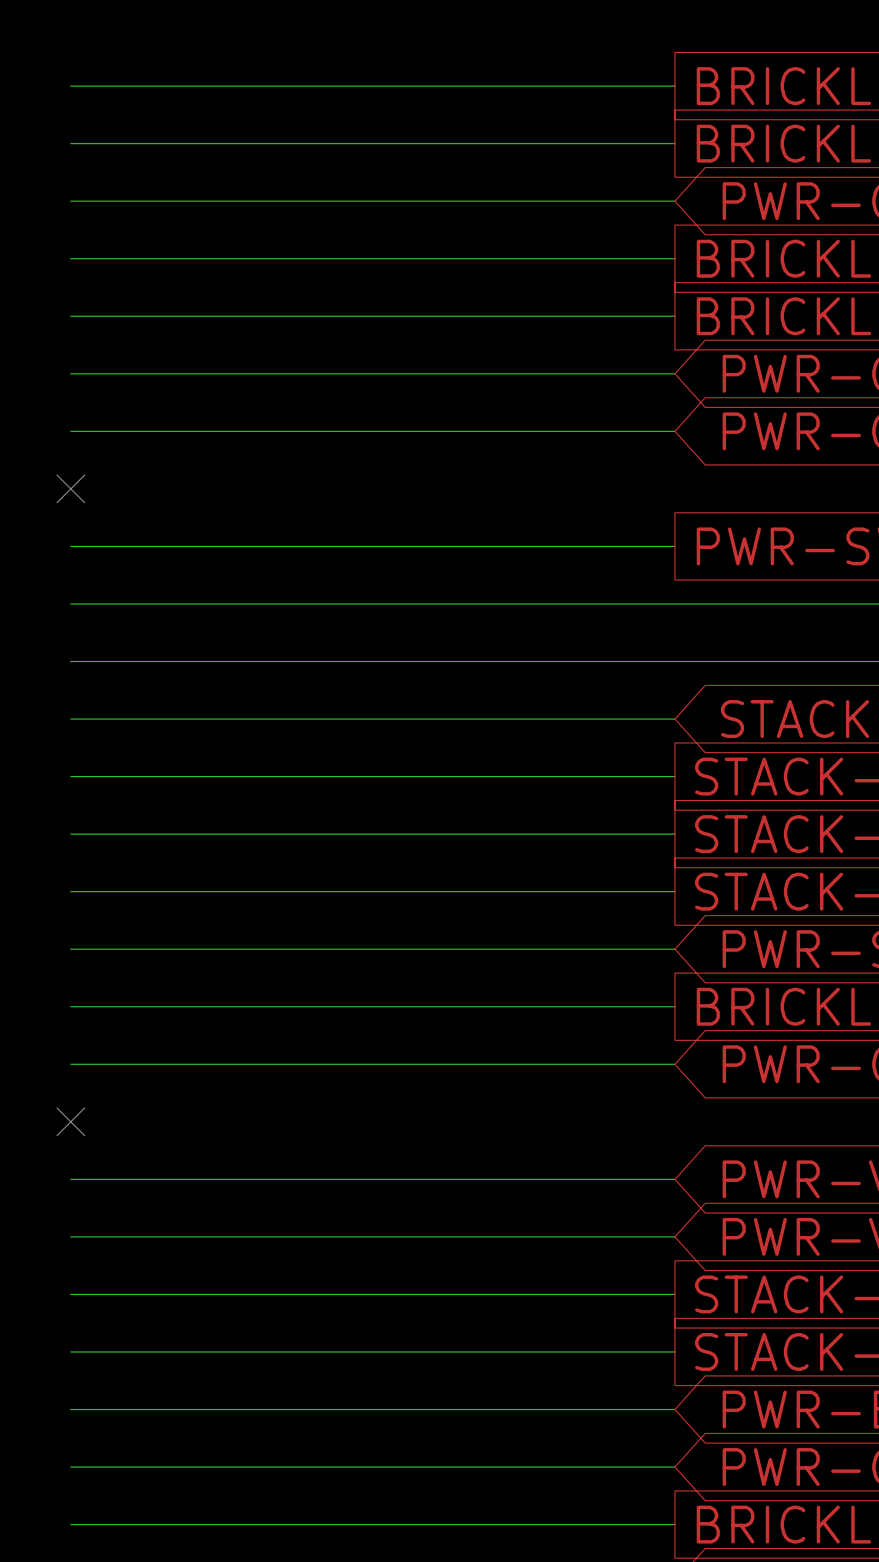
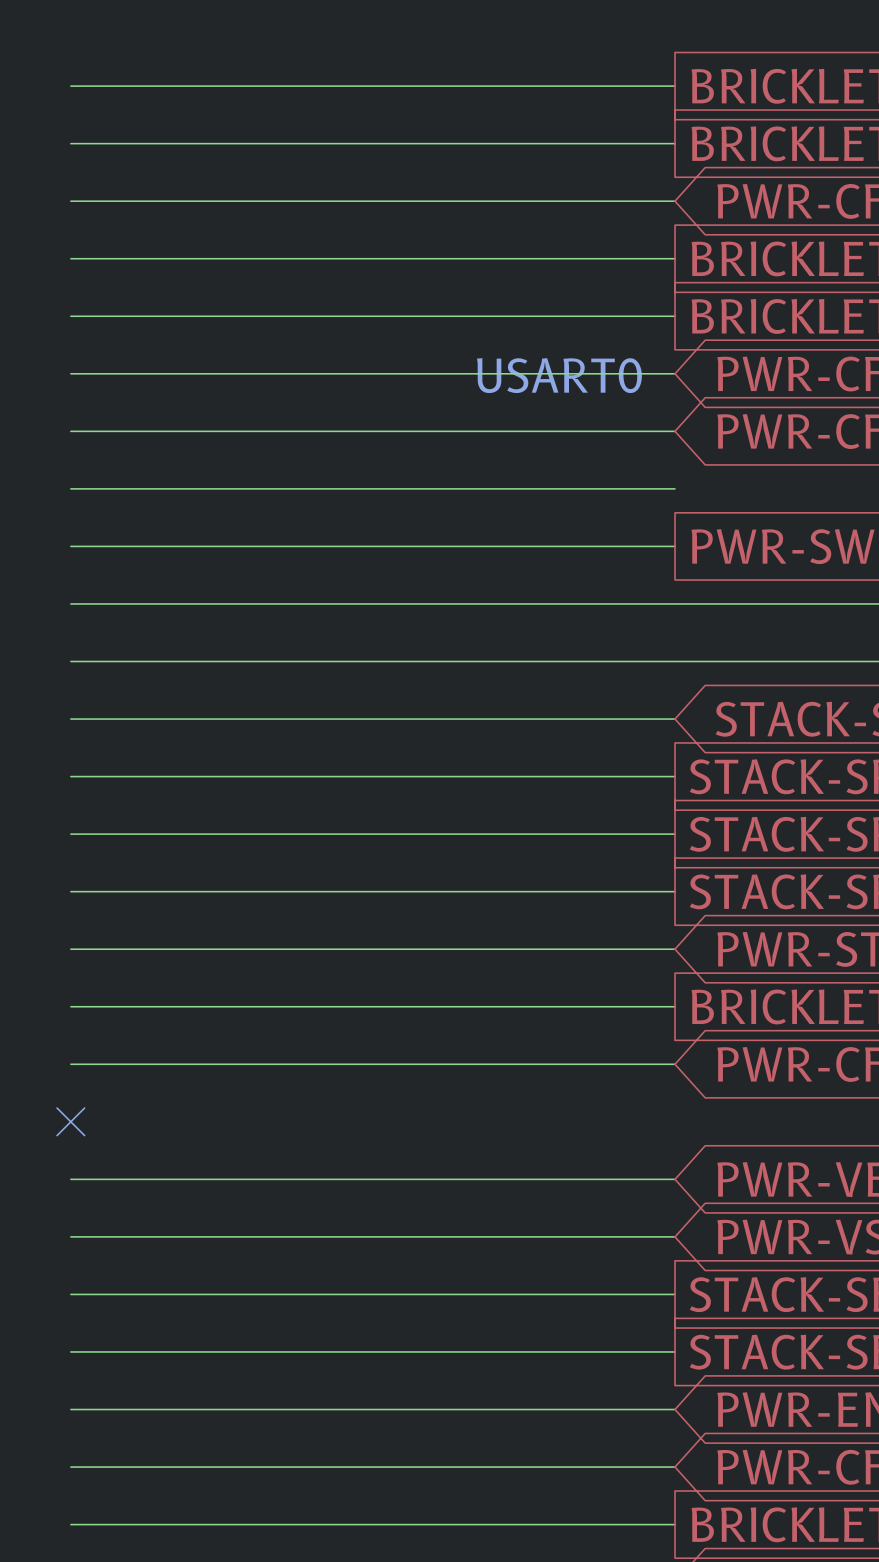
text: none -> USART0 (559, 375)
wire: none -> (70, 488) (675, 488)
no-connect mark: (70, 488) -> none

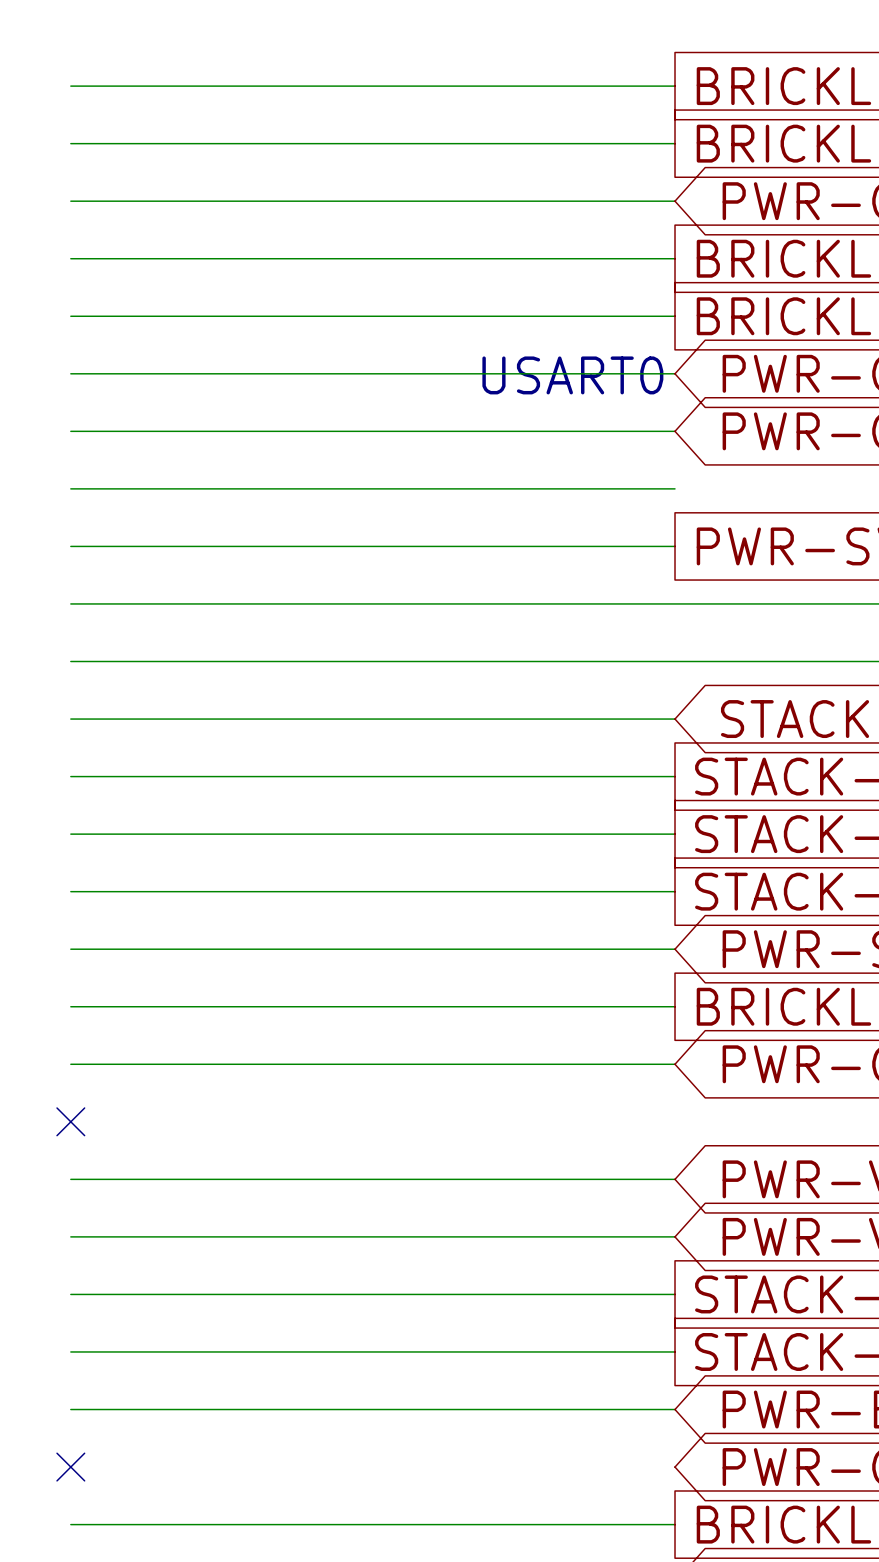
wire: (70, 1467) (675, 1467) -> none
no-connect mark: none -> (70, 1467)

